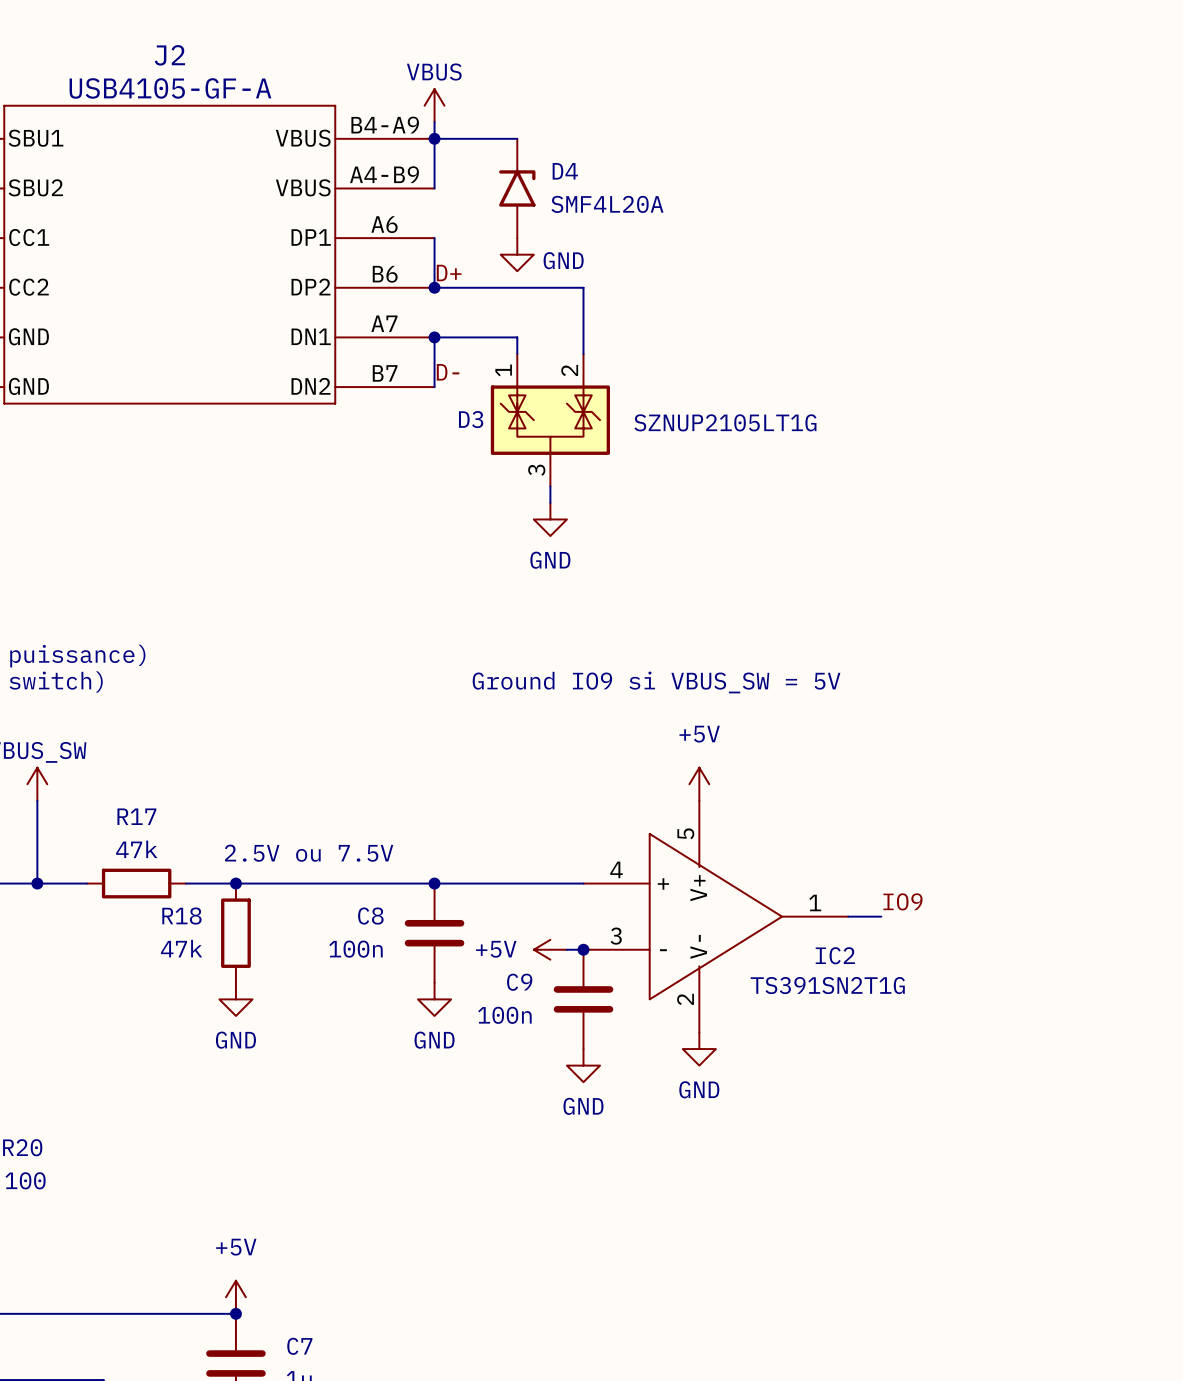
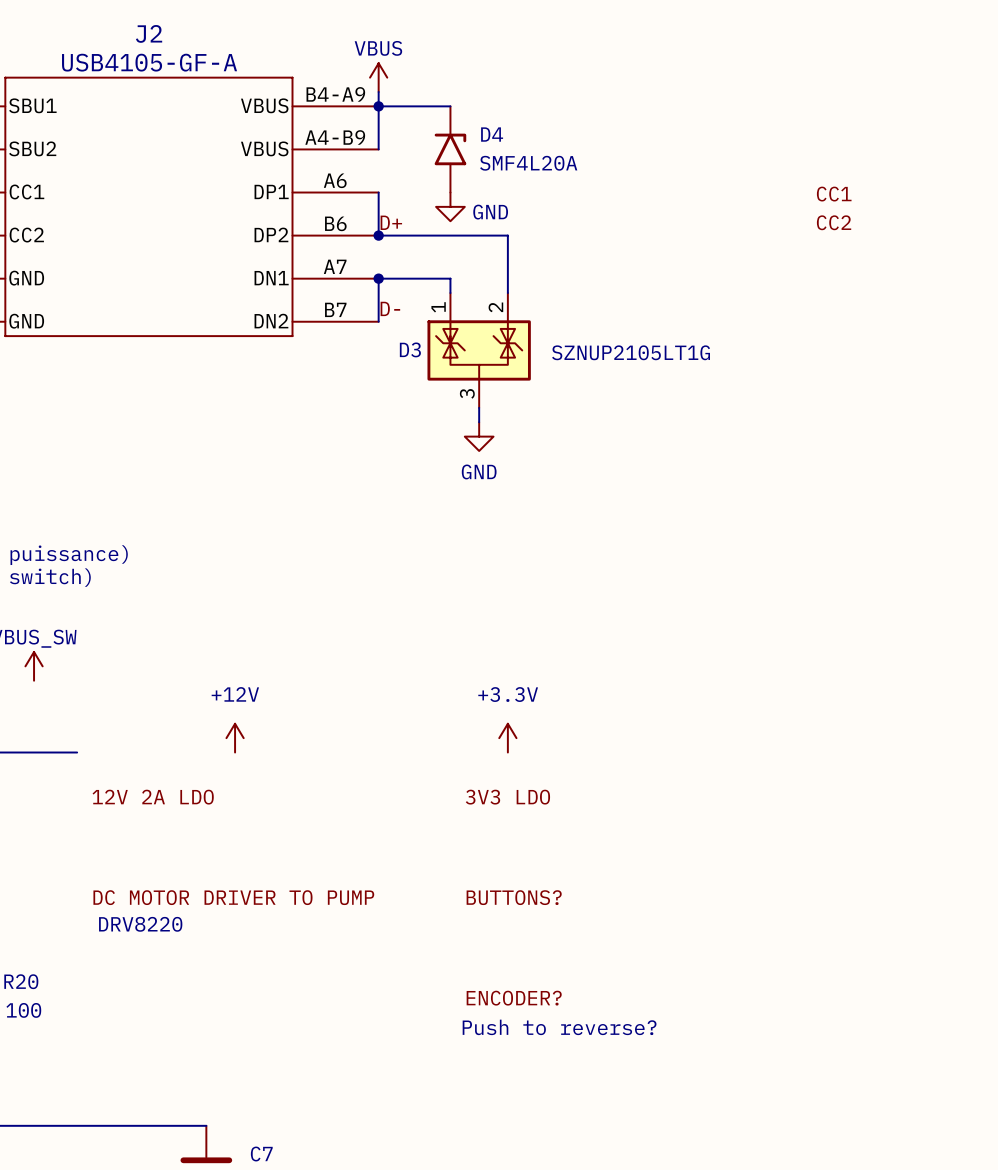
label: none -> CC1 (834, 194)
label: none -> CC2 (834, 222)
text: Ground IO9 si VBUS_SW = 5V (656, 682) -> none
power symbol: +5V (699, 784) -> none
wire: (37, 800) (37, 883) -> none
text: 2.5V ou 7.5V (309, 853) -> none
power symbol: none -> +12V (235, 738)
power symbol: none -> +3.3V (507, 738)
junction: (37, 883) -> none
R17: 47k (136, 883) -> none
wire: (186, 883) (583, 883) -> none
junction: (235, 883) -> none
junction: (434, 883) -> none
label: IO9 (902, 901) -> none
IC2: TS391SN2T1G (715, 916) -> none
wire: (848, 916) (881, 916) -> none
R18: 47k (235, 933) -> none
C8: 100n (434, 933) -> none
label: none -> 12V 2A LDO (153, 797)
label: none -> 3V3 LDO (507, 797)
power symbol: +5V (550, 949) -> none
wire: (566, 949) (583, 949) -> none
junction: (583, 949) -> none
power symbol: GND (235, 999) -> none
power symbol: GND (434, 999) -> none
C9: 100n (583, 999) -> none
power symbol: GND (699, 1049) -> none
label: none -> DC MOTOR DRIVER TO PUMP (233, 897)
label: none -> BUTTONS? (514, 897)
power symbol: GND (583, 1065) -> none
text: none -> DRV8220 (140, 924)
label: none -> ENCODER? (514, 998)
text: none -> Push to reverse? (559, 1027)
power symbol: +5V (235, 1297) -> none
junction: (235, 1313) -> none

